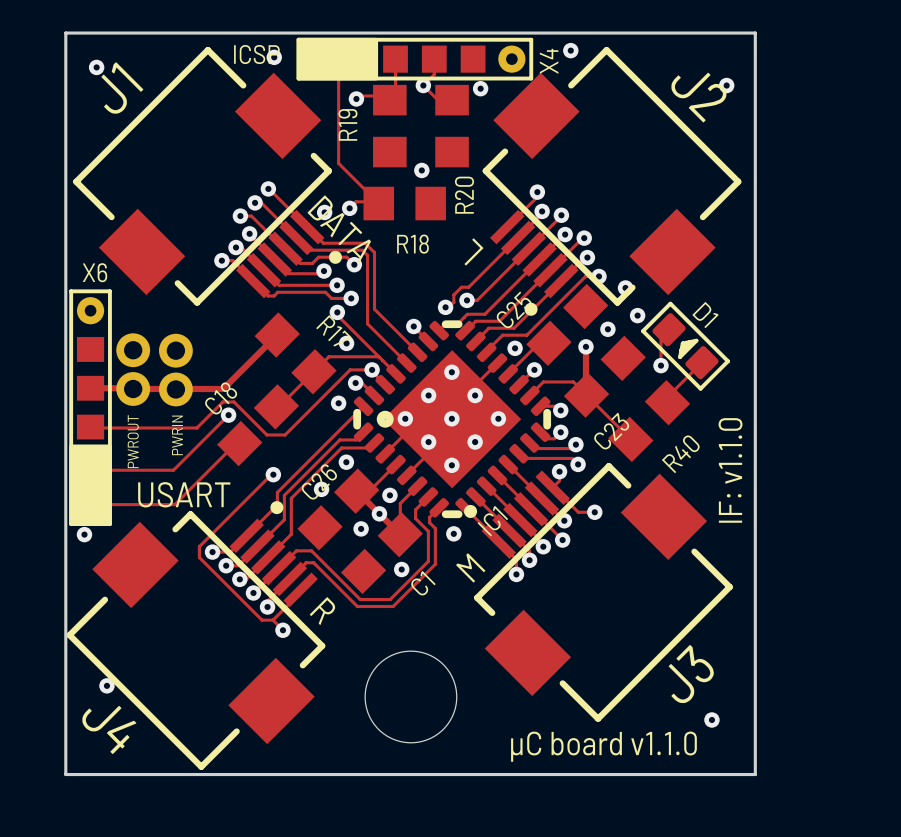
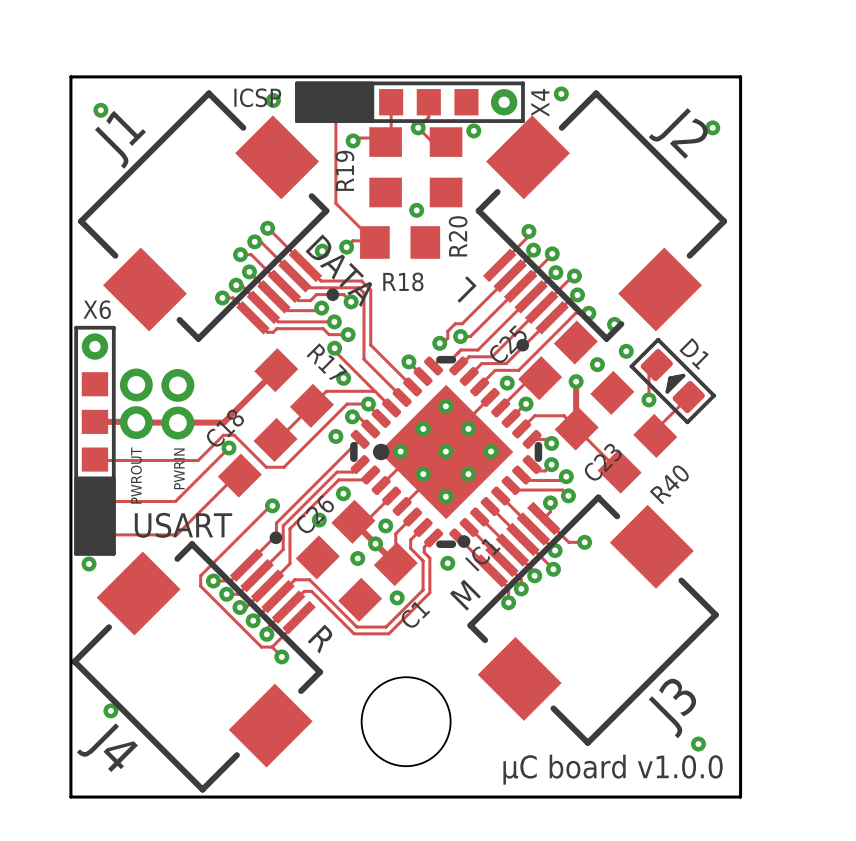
text: IF: v1.1.0 (730, 470) -> none
text: µC board v1.1.0 (603, 746) -> µC board v1.0.0 (613, 769)

